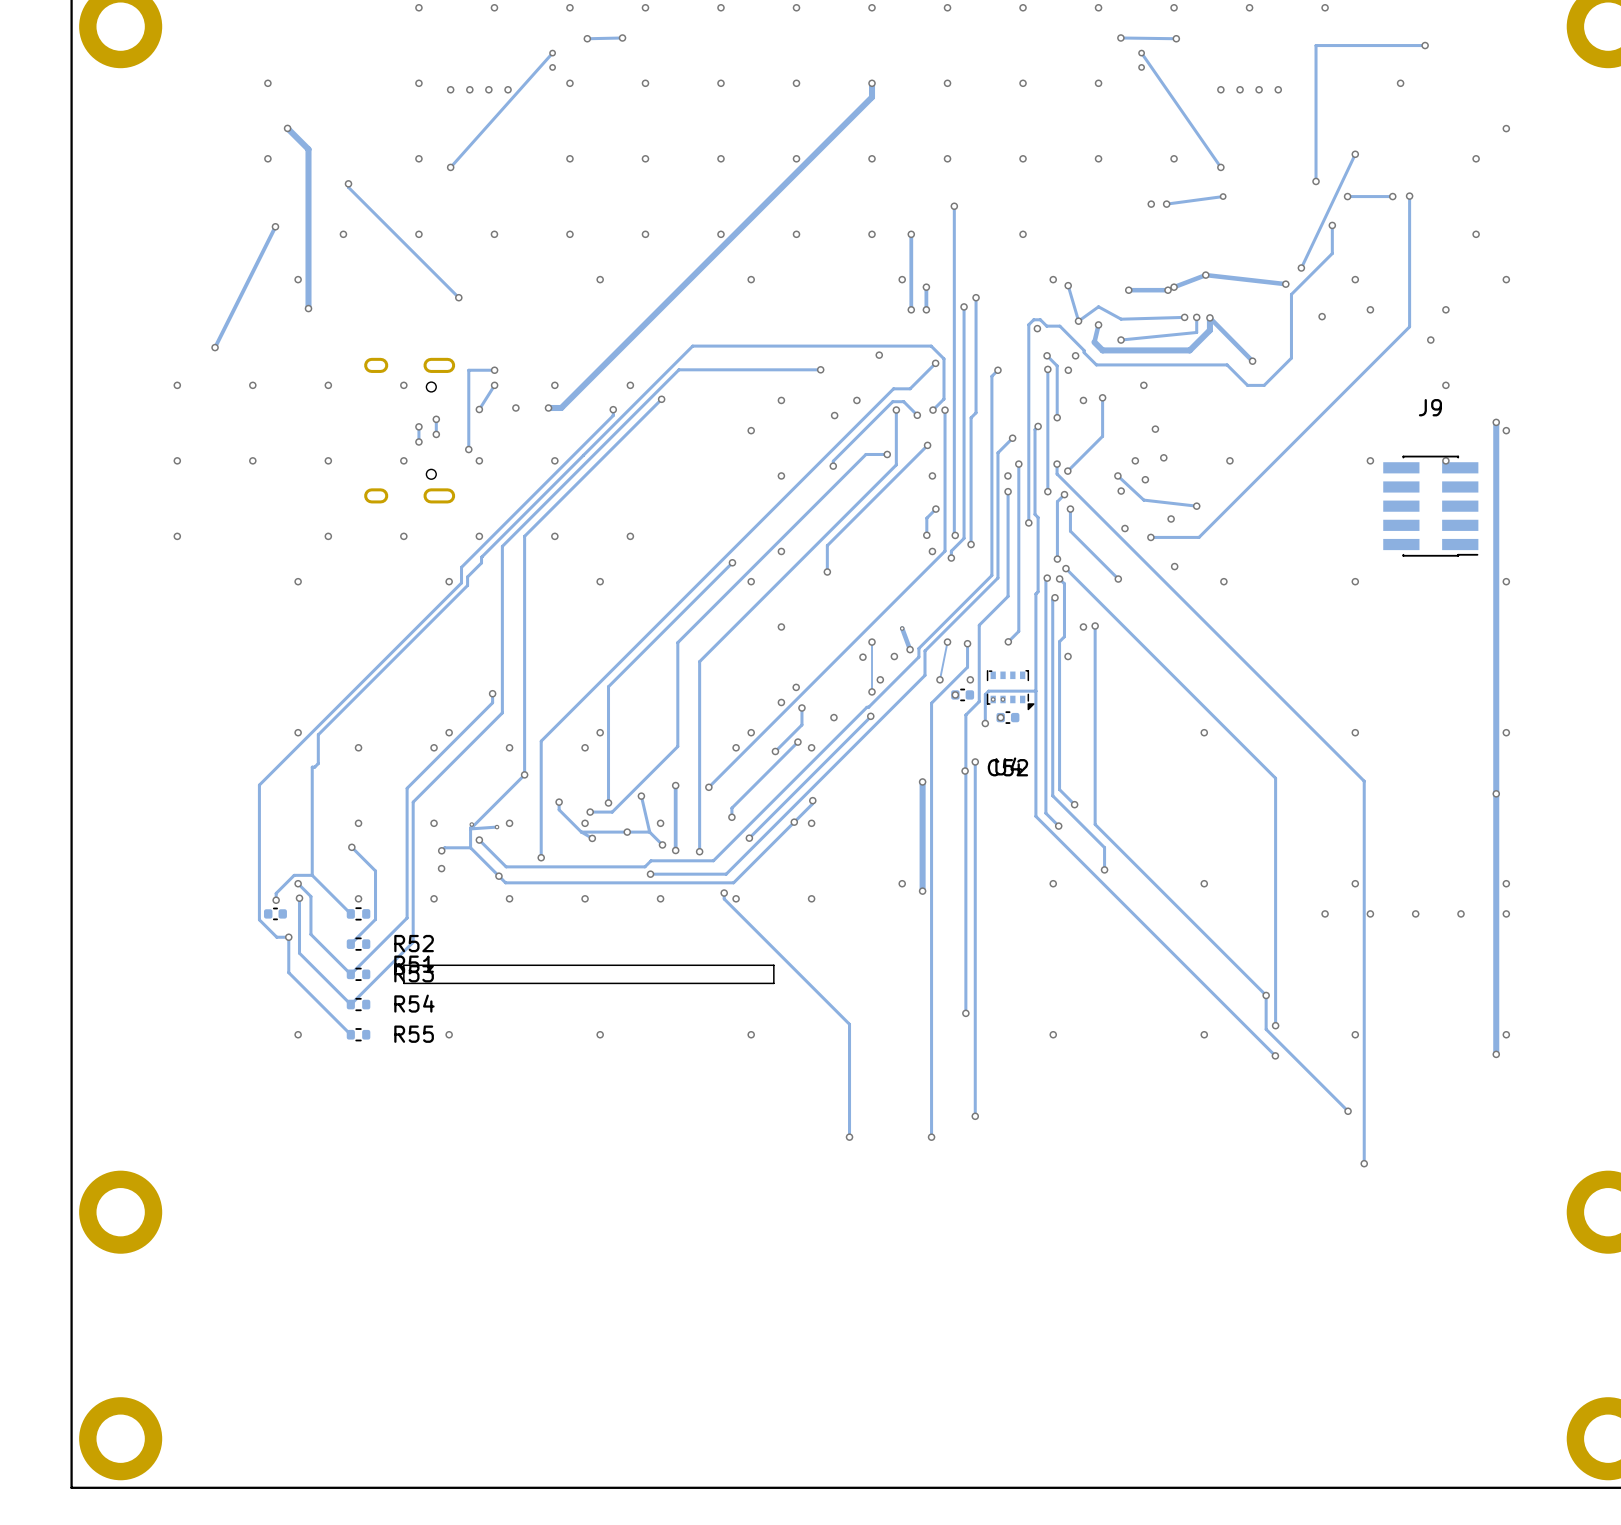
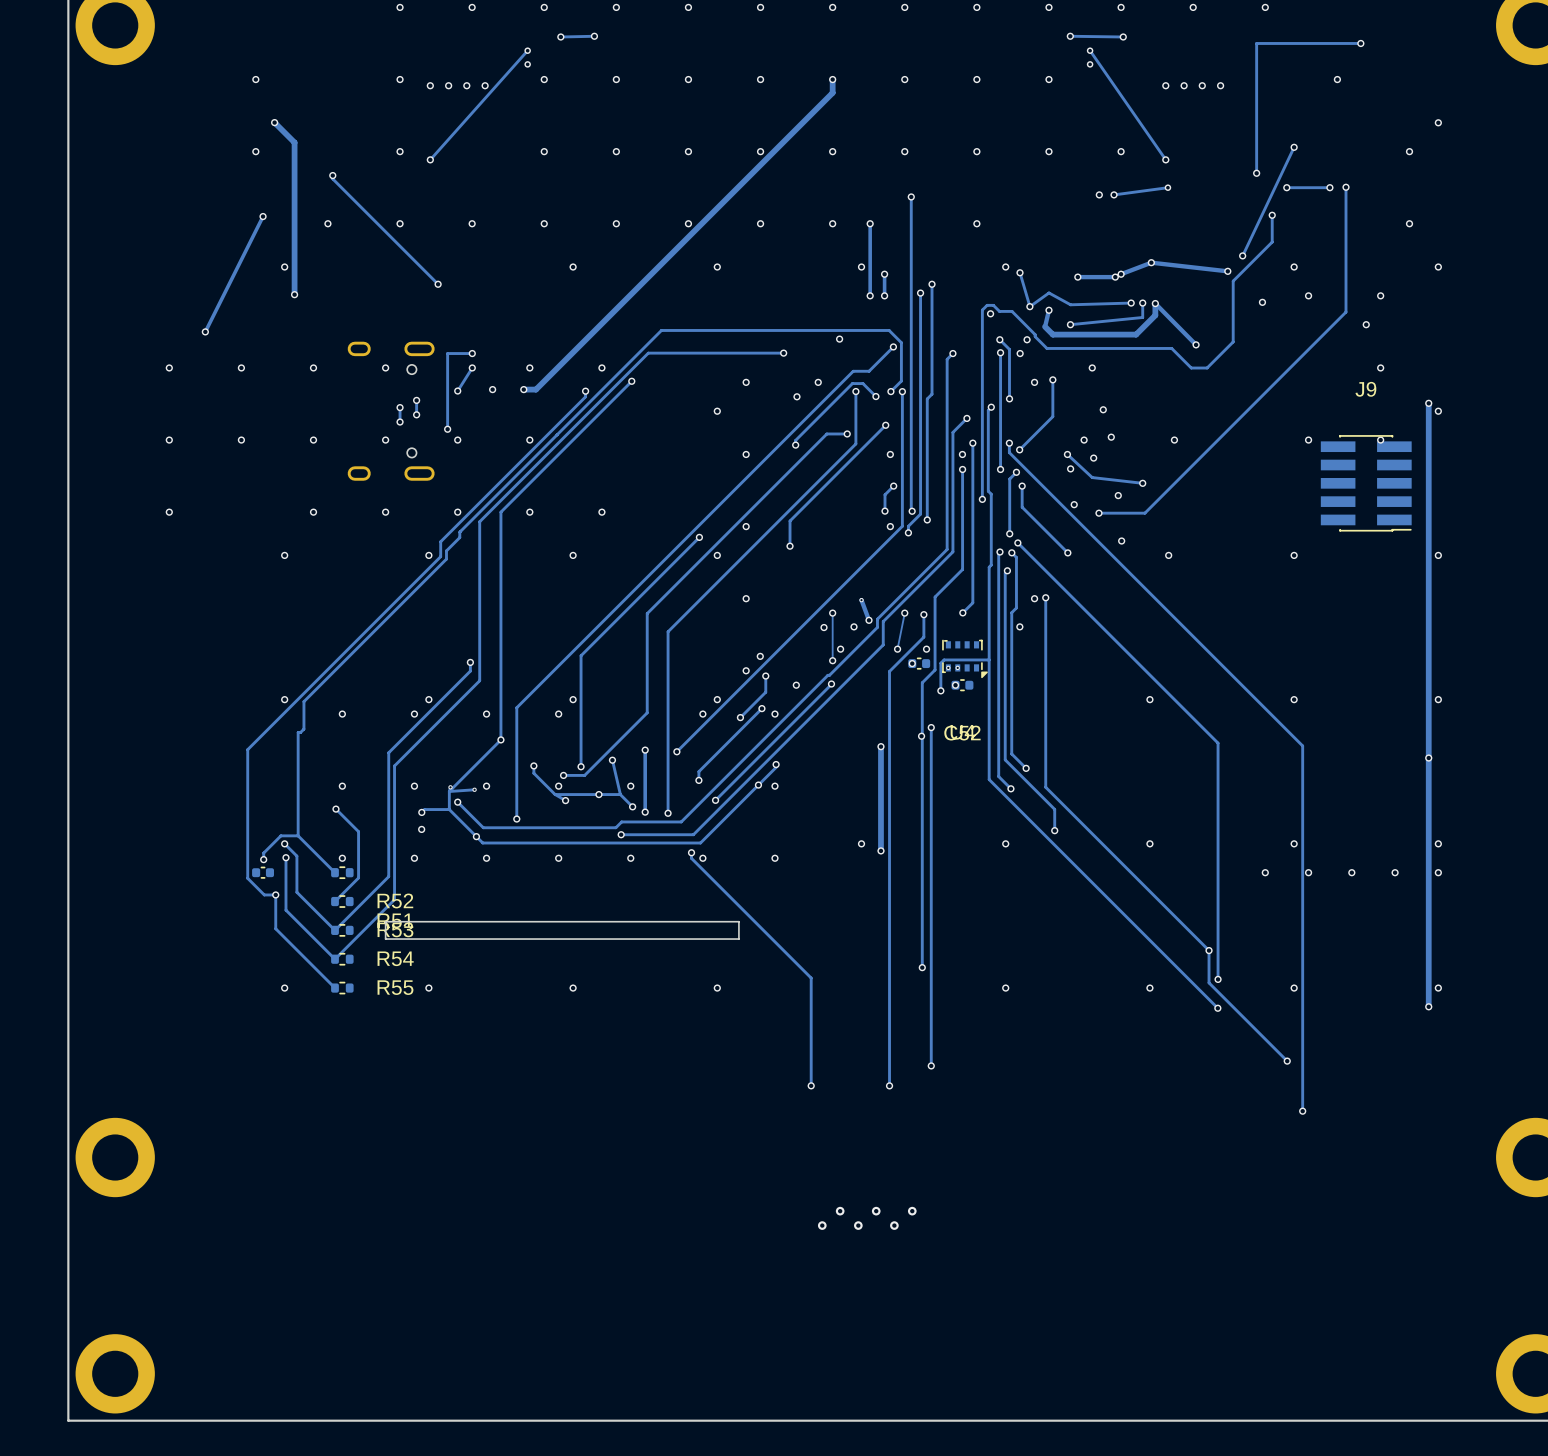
via: none -> (840, 1211)
via: none -> (876, 1211)
via: none -> (912, 1211)
via: none -> (822, 1225)
via: none -> (858, 1225)
via: none -> (894, 1225)

